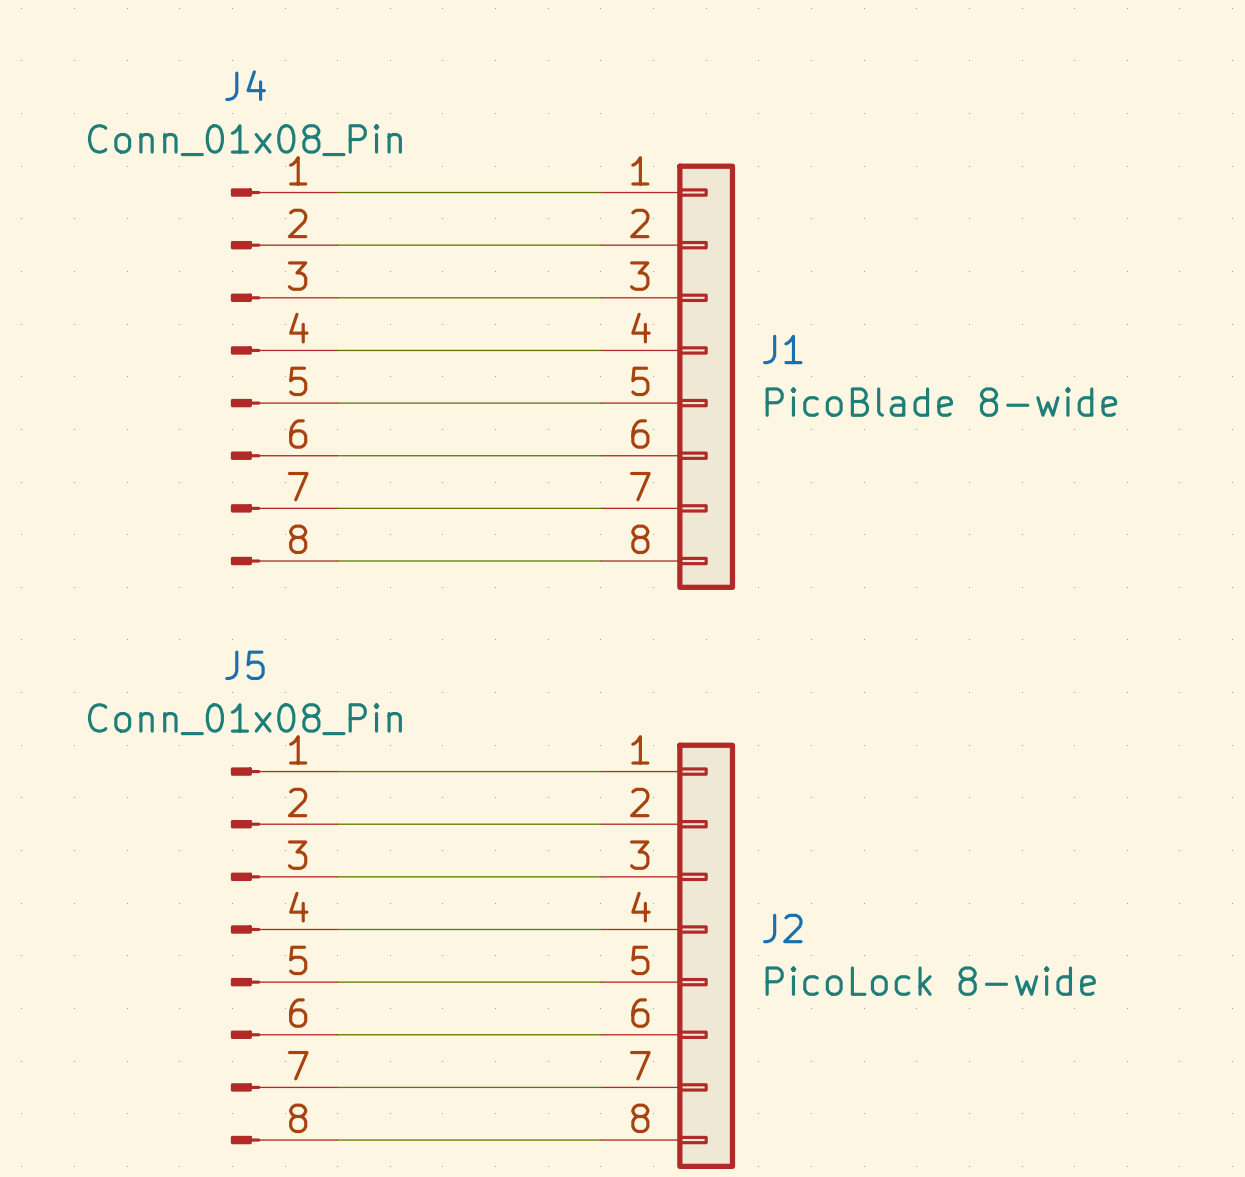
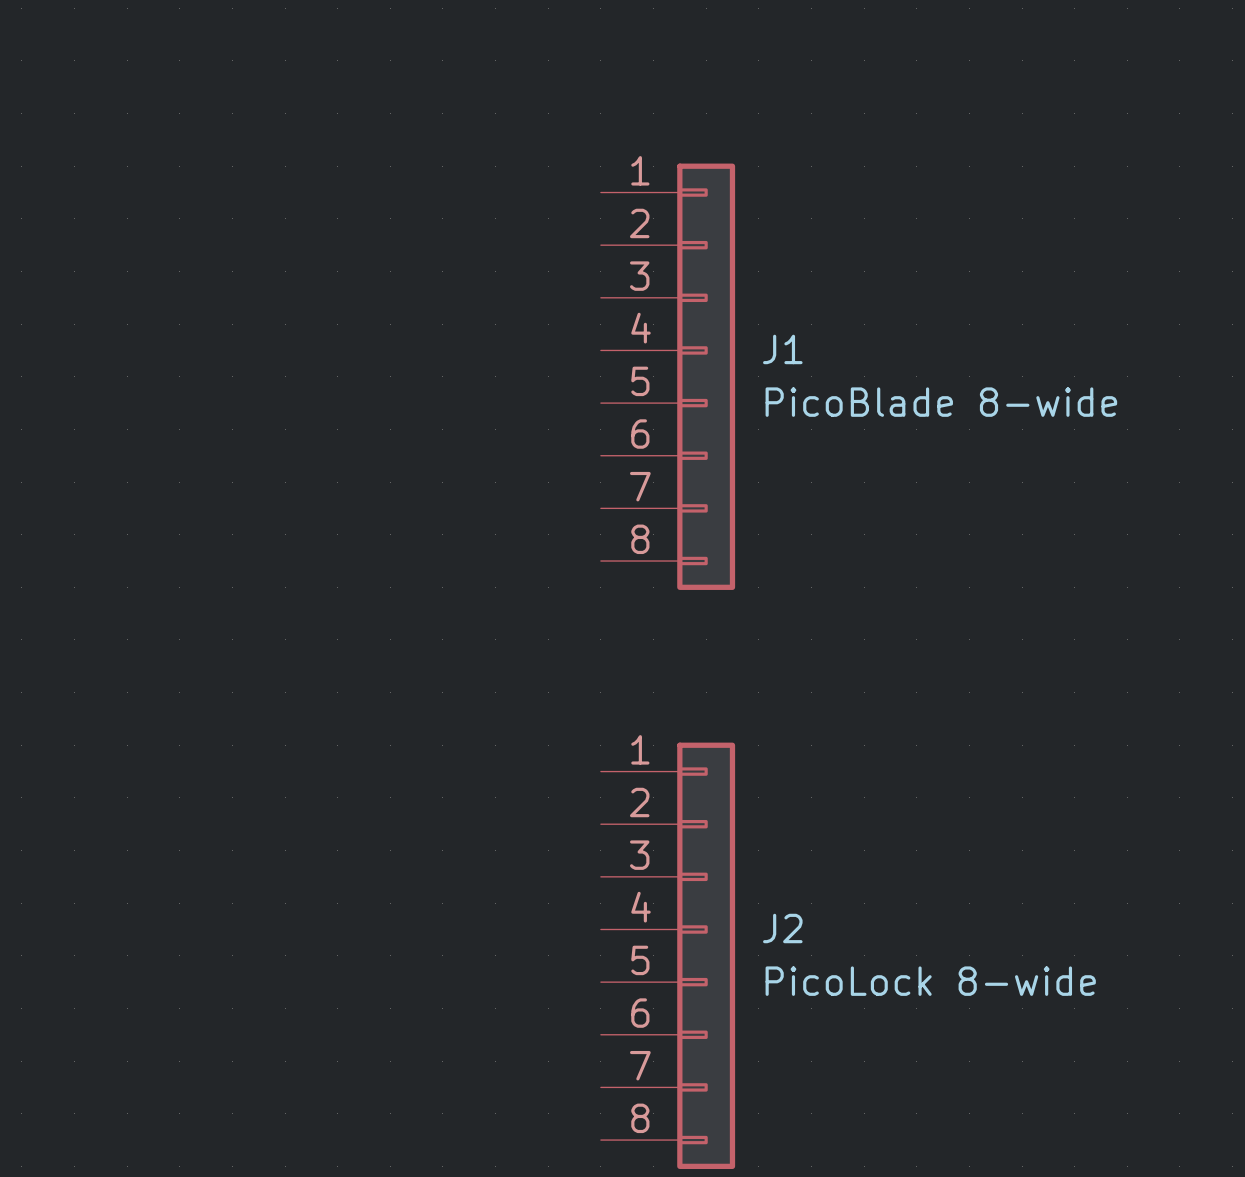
wire: (337, 192) (600, 192) -> none
wire: (337, 245) (600, 245) -> none
wire: (337, 297) (600, 297) -> none
wire: (337, 350) (600, 350) -> none
J4: Conn_01x08_Pin (284, 376) -> none
wire: (337, 403) (600, 403) -> none
wire: (337, 455) (600, 455) -> none
wire: (337, 508) (600, 508) -> none
wire: (337, 561) (600, 561) -> none
wire: (337, 771) (600, 771) -> none
wire: (337, 824) (600, 824) -> none
wire: (337, 876) (600, 876) -> none
wire: (337, 929) (600, 929) -> none
J5: Conn_01x08_Pin (284, 955) -> none
wire: (337, 982) (600, 982) -> none
wire: (337, 1034) (600, 1034) -> none
wire: (337, 1087) (600, 1087) -> none
wire: (337, 1140) (600, 1140) -> none

